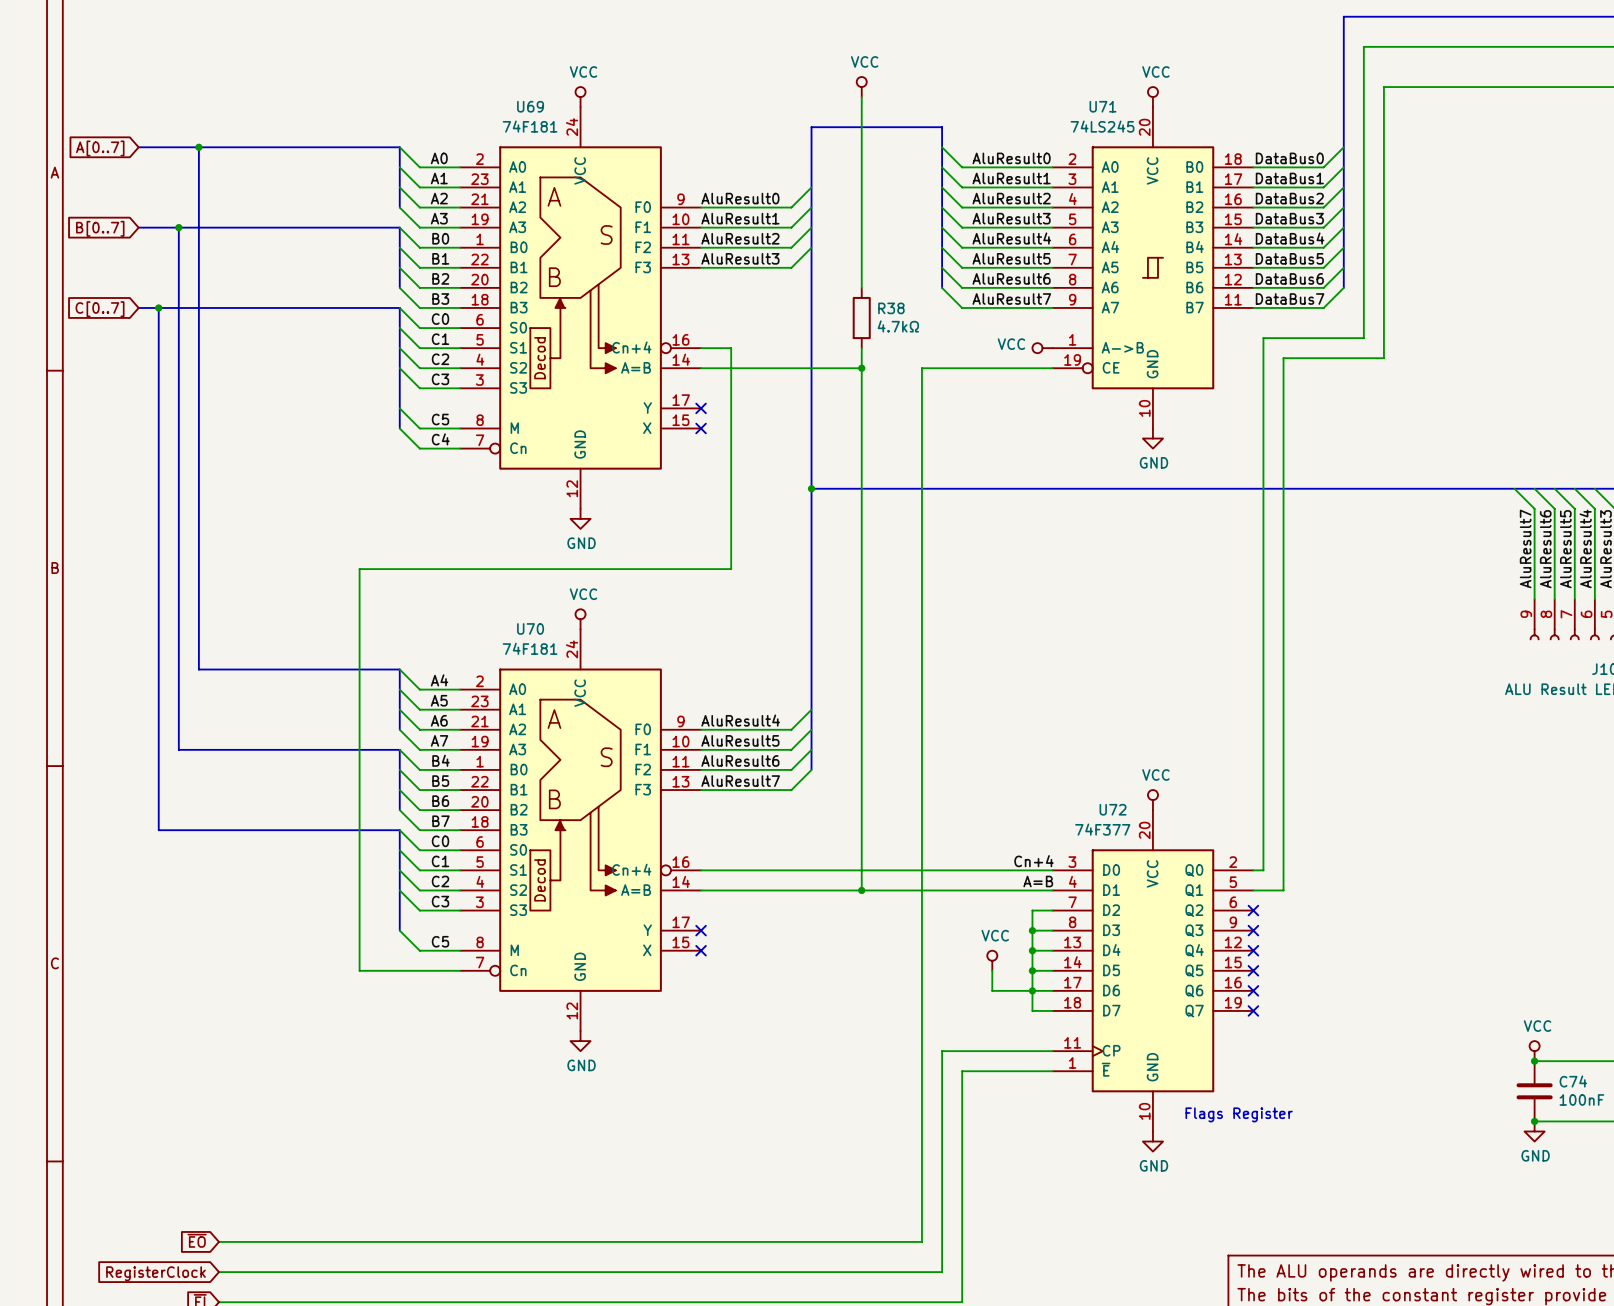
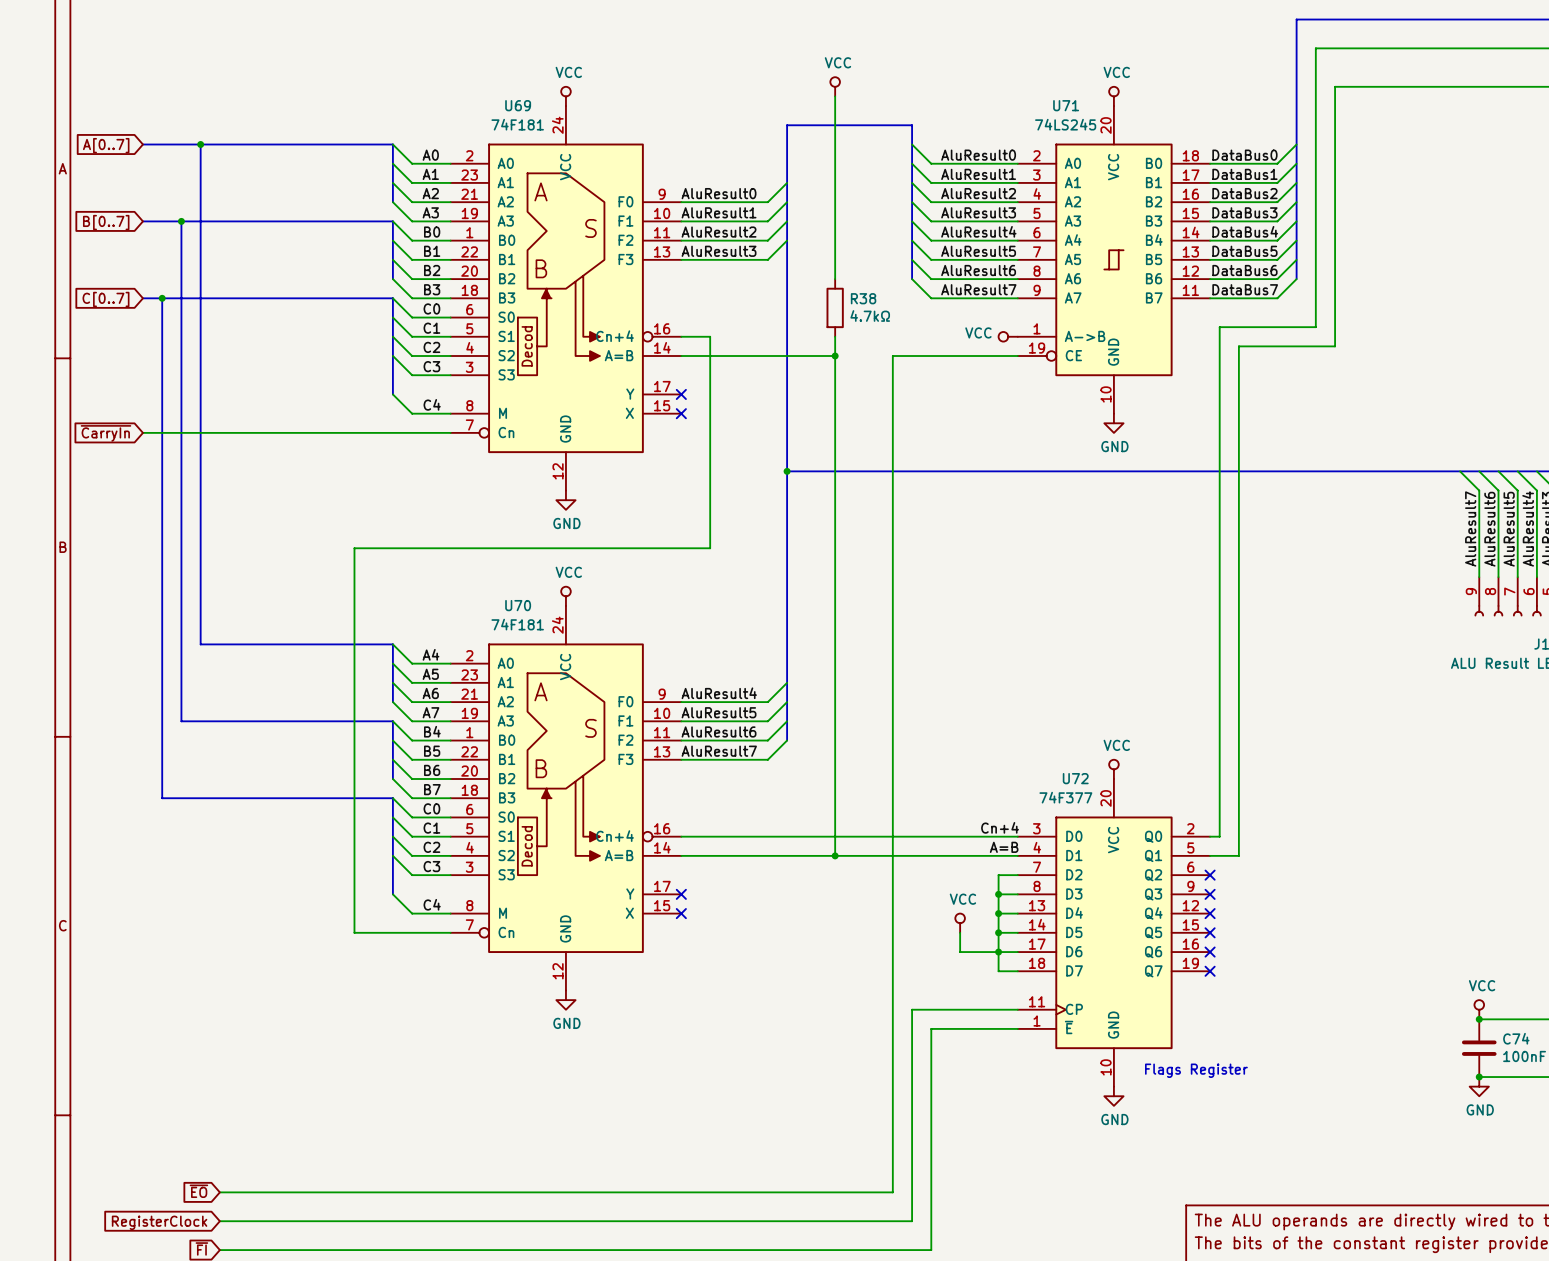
bus: (399, 408) (399, 428) -> none
label: C5 (440, 419) -> C4 (432, 404)
wire: (399, 428) (419, 448) -> (142, 432) (412, 432)
label: C4 (440, 439) -> none
global label: none -> ~{CarryIn} (105, 433)
label: C5 (440, 941) -> C4 (432, 904)

